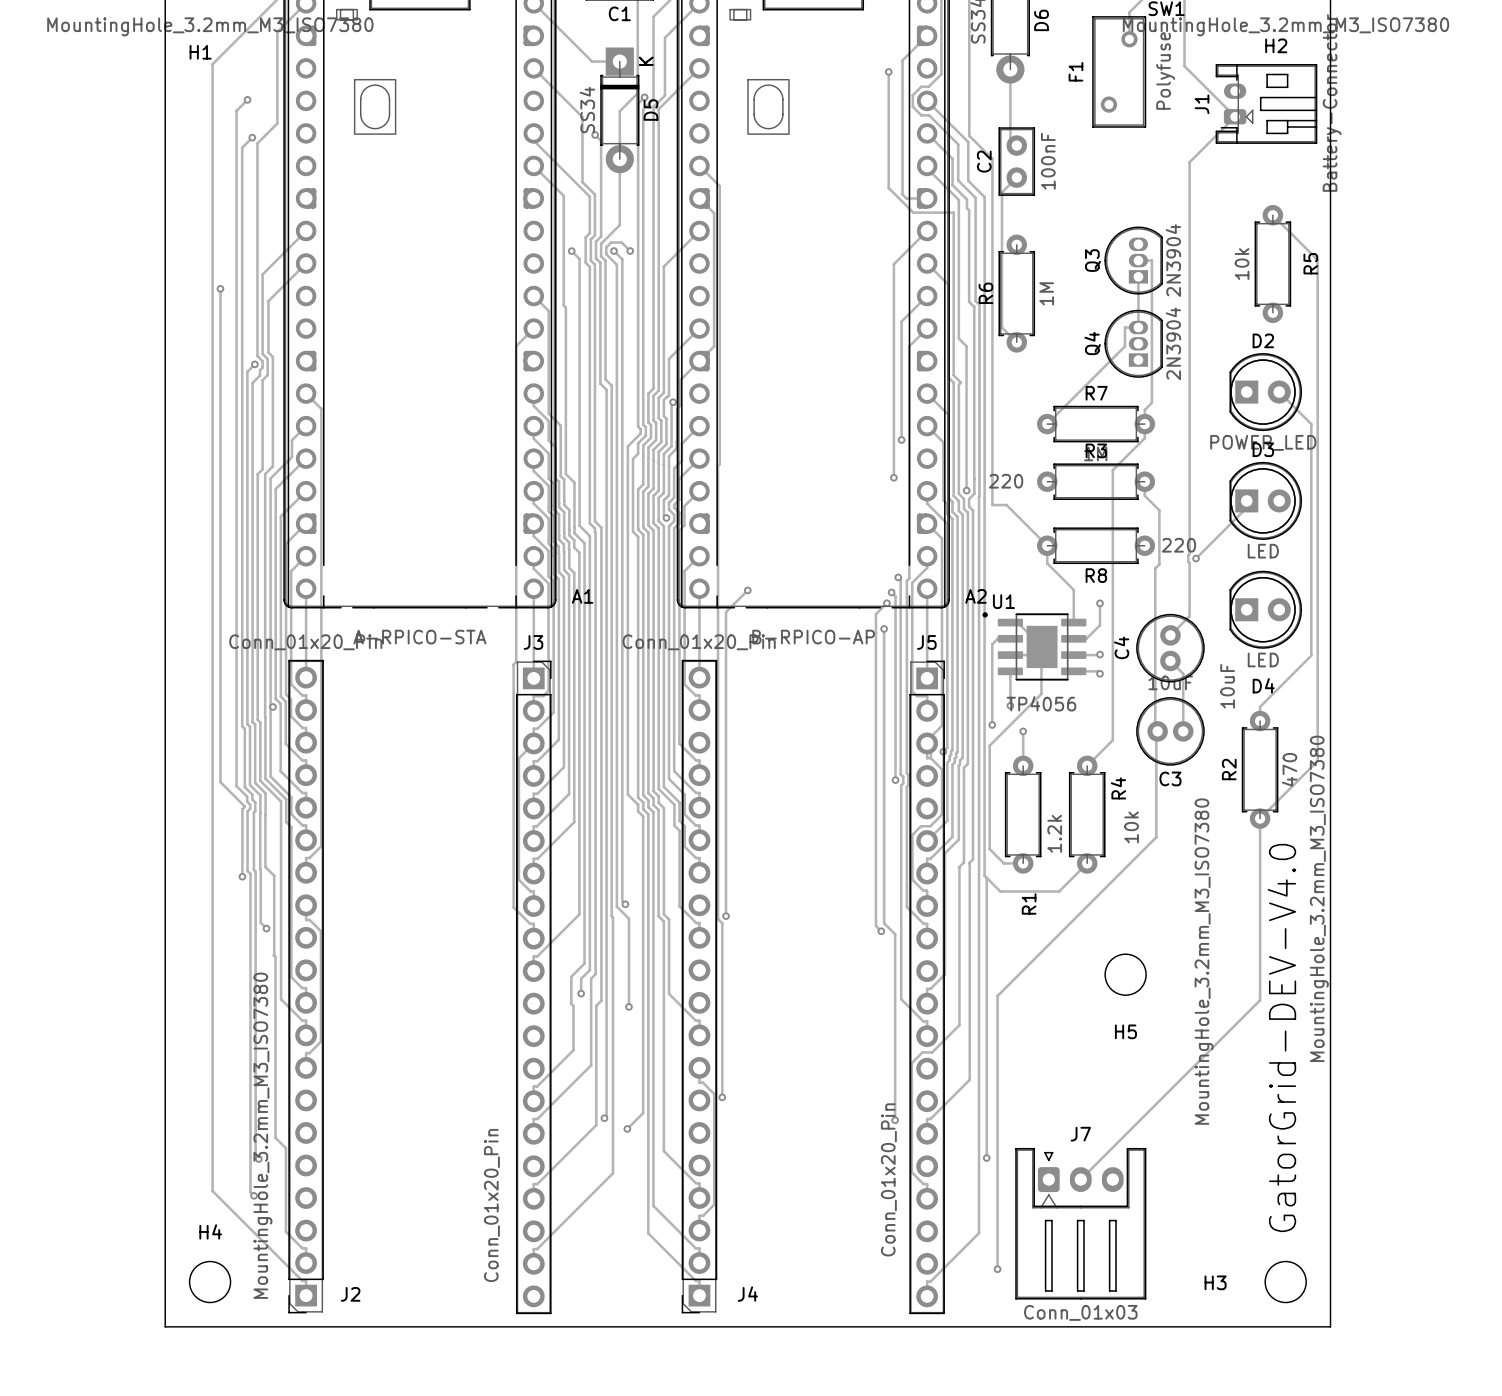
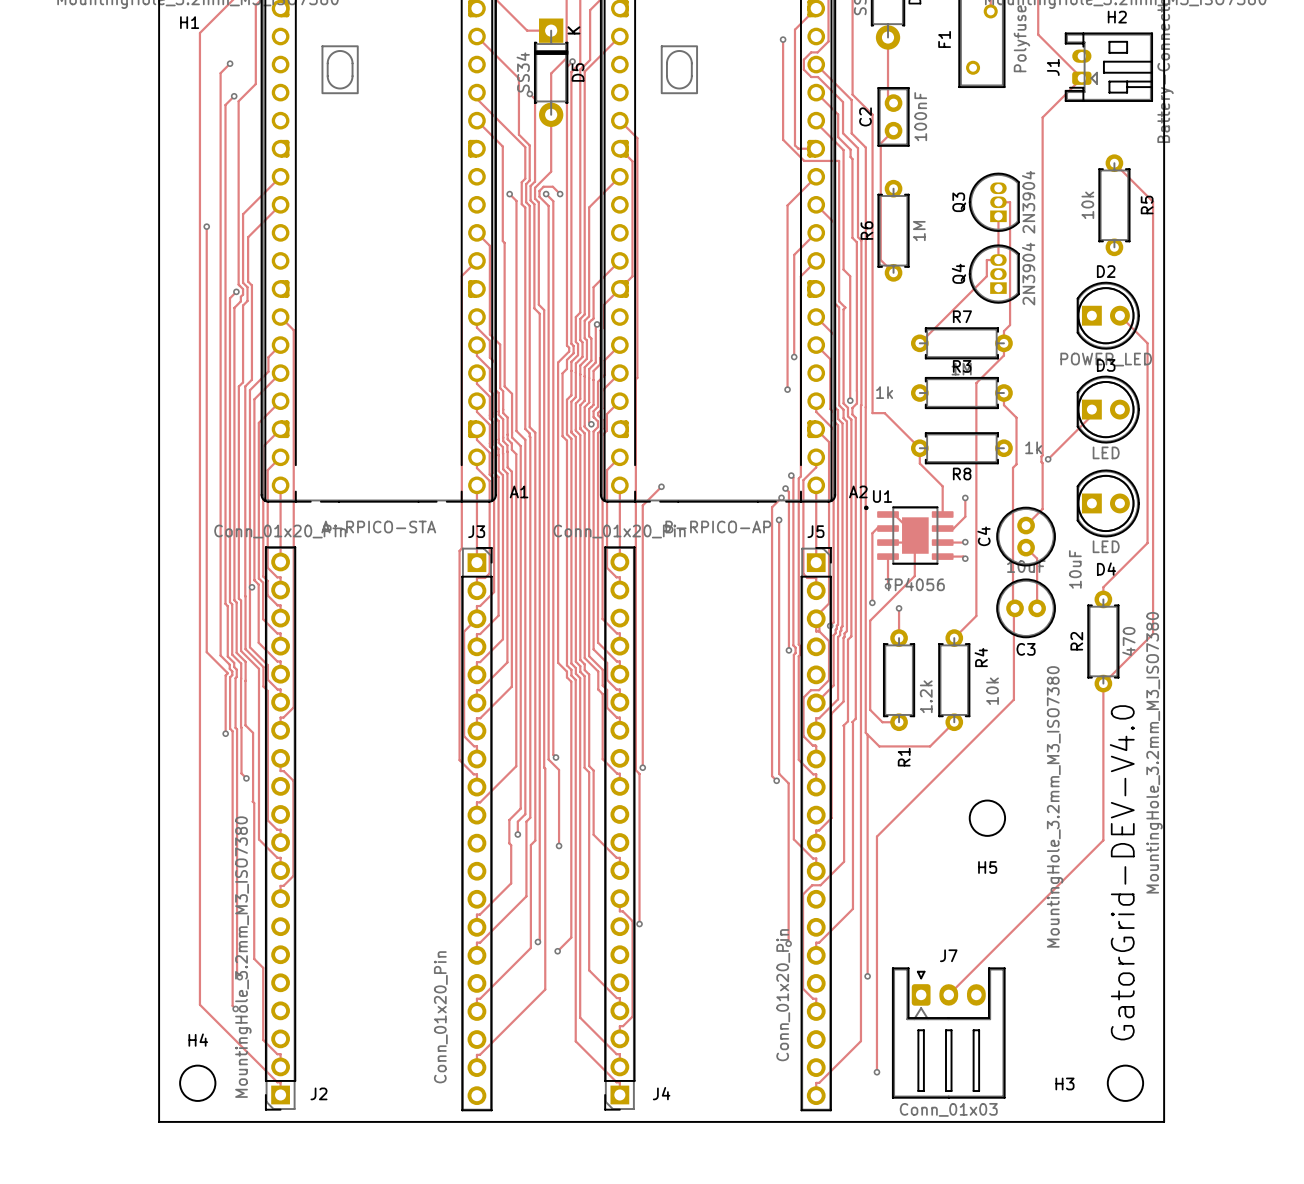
R8 value: 220 (1006, 481) -> 1k (884, 392)
R3 value: 220 (1178, 545) -> 1k (1033, 447)

